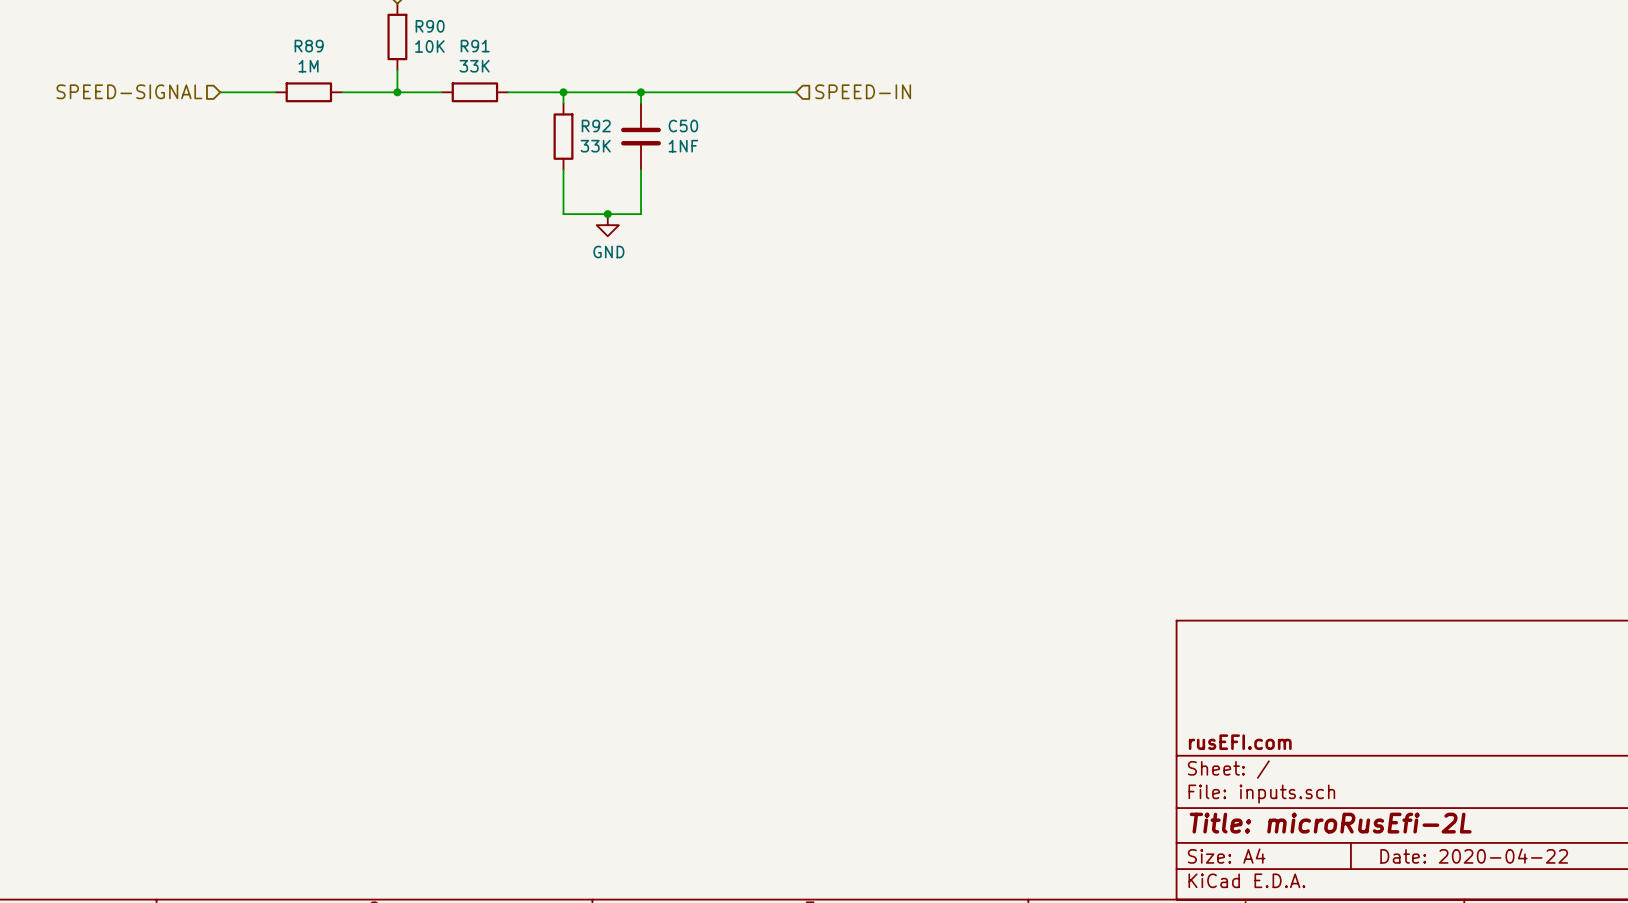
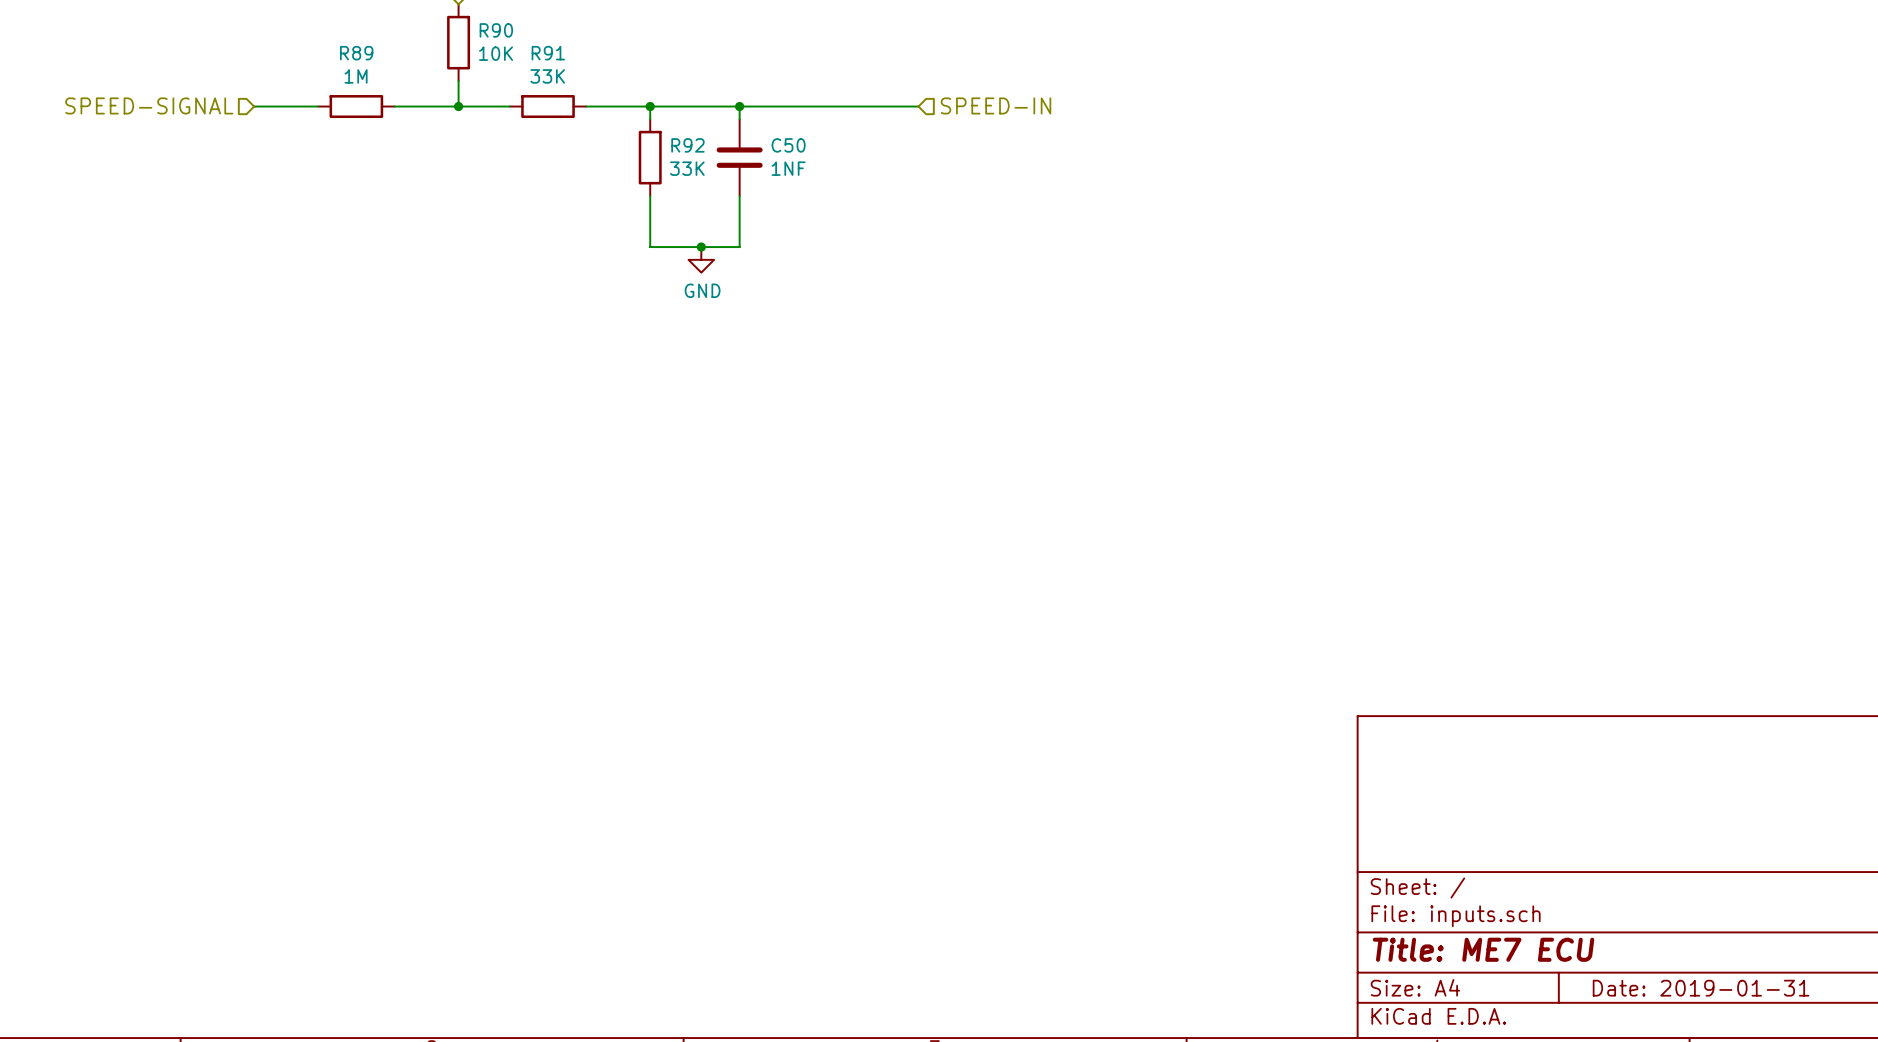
title block: rusEFI.com (1240, 742) -> none
title block: Title: microRusEfi-2L (1330, 823) -> Title: ME7 ECU (1483, 949)
title block: Date: 2020-04-22 (1474, 856) -> Date: 2019-01-31 (1701, 988)

